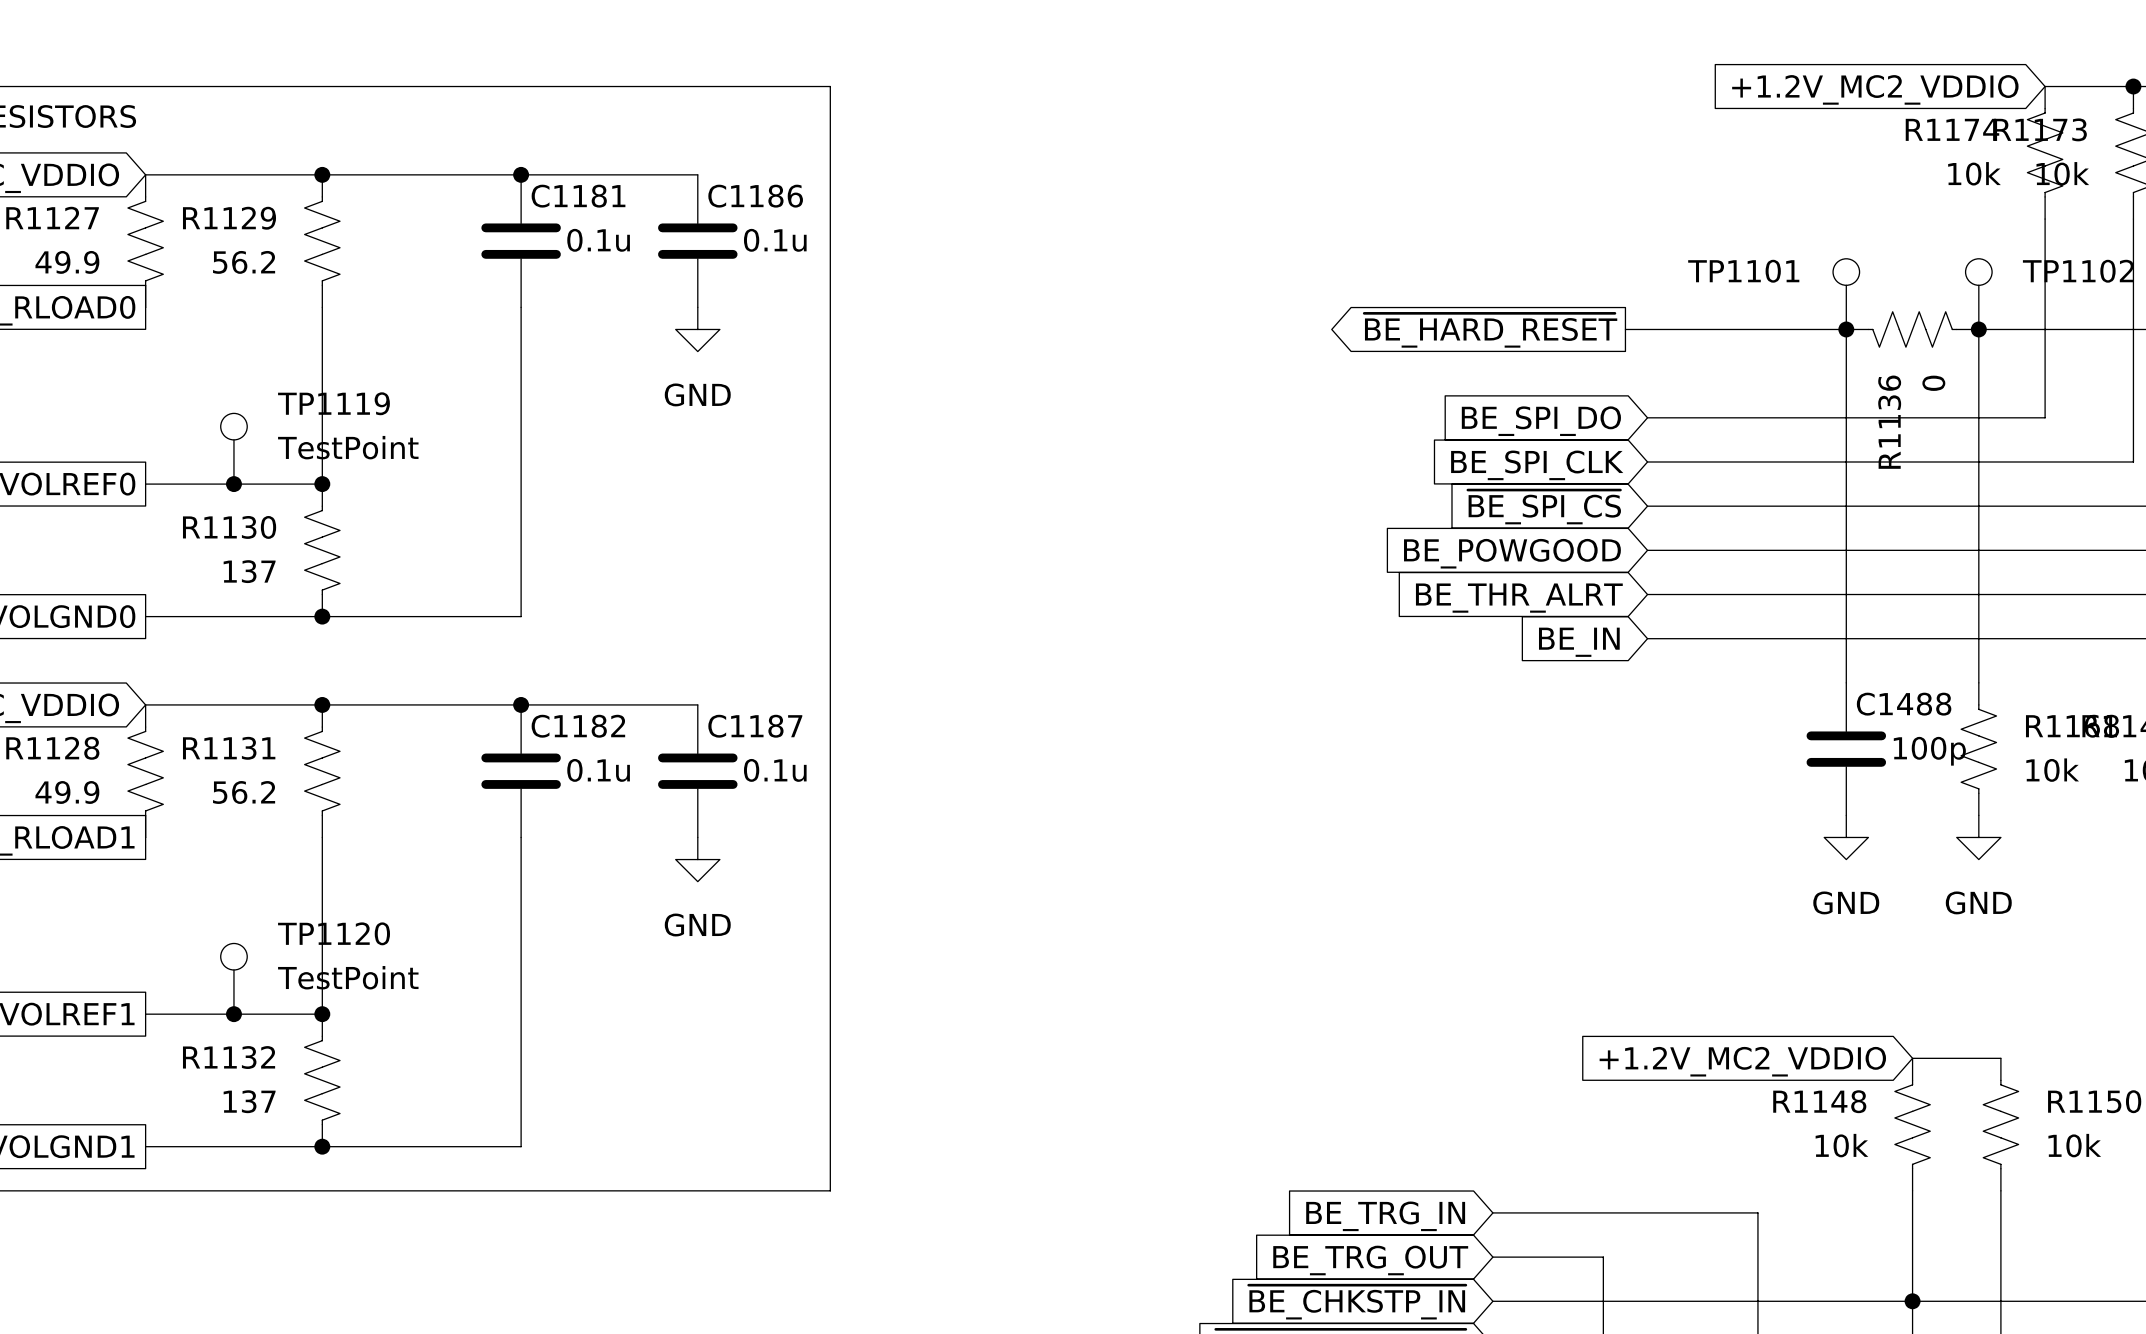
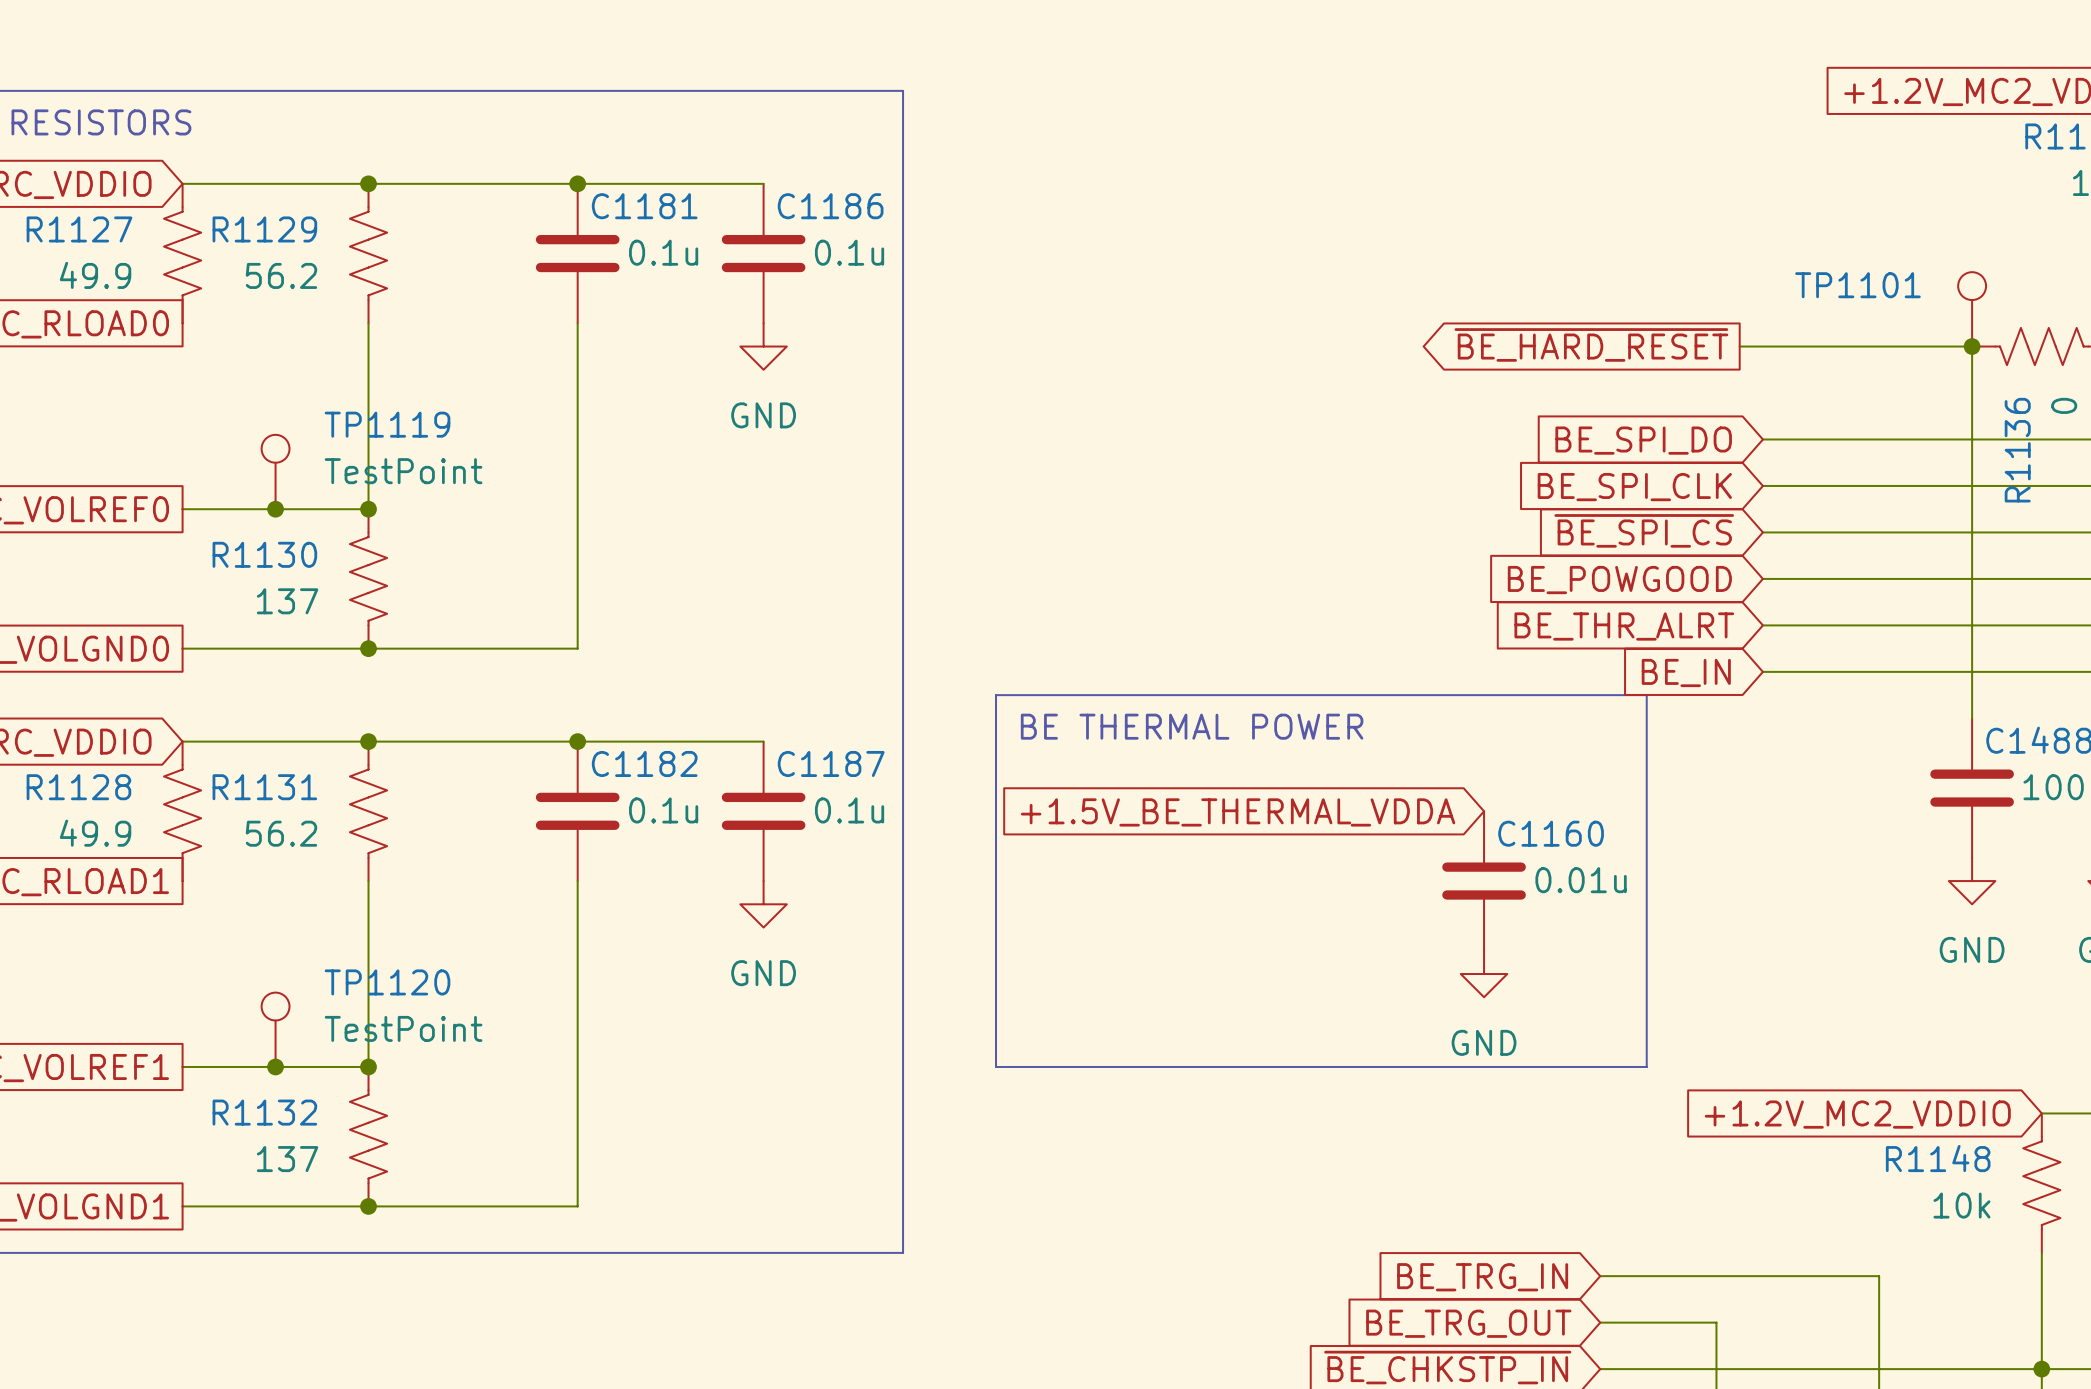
line: none -> (996, 695) (1646, 695) (1646, 1066) (996, 1066) (996, 695)
text: none -> BE THERMAL POWER (1192, 726)
global label: none -> +1.5V_BE_THERMAL_VDDA (1238, 812)
C1160: none -> 0.01u (1484, 881)
power symbol: none -> GND (1484, 974)

